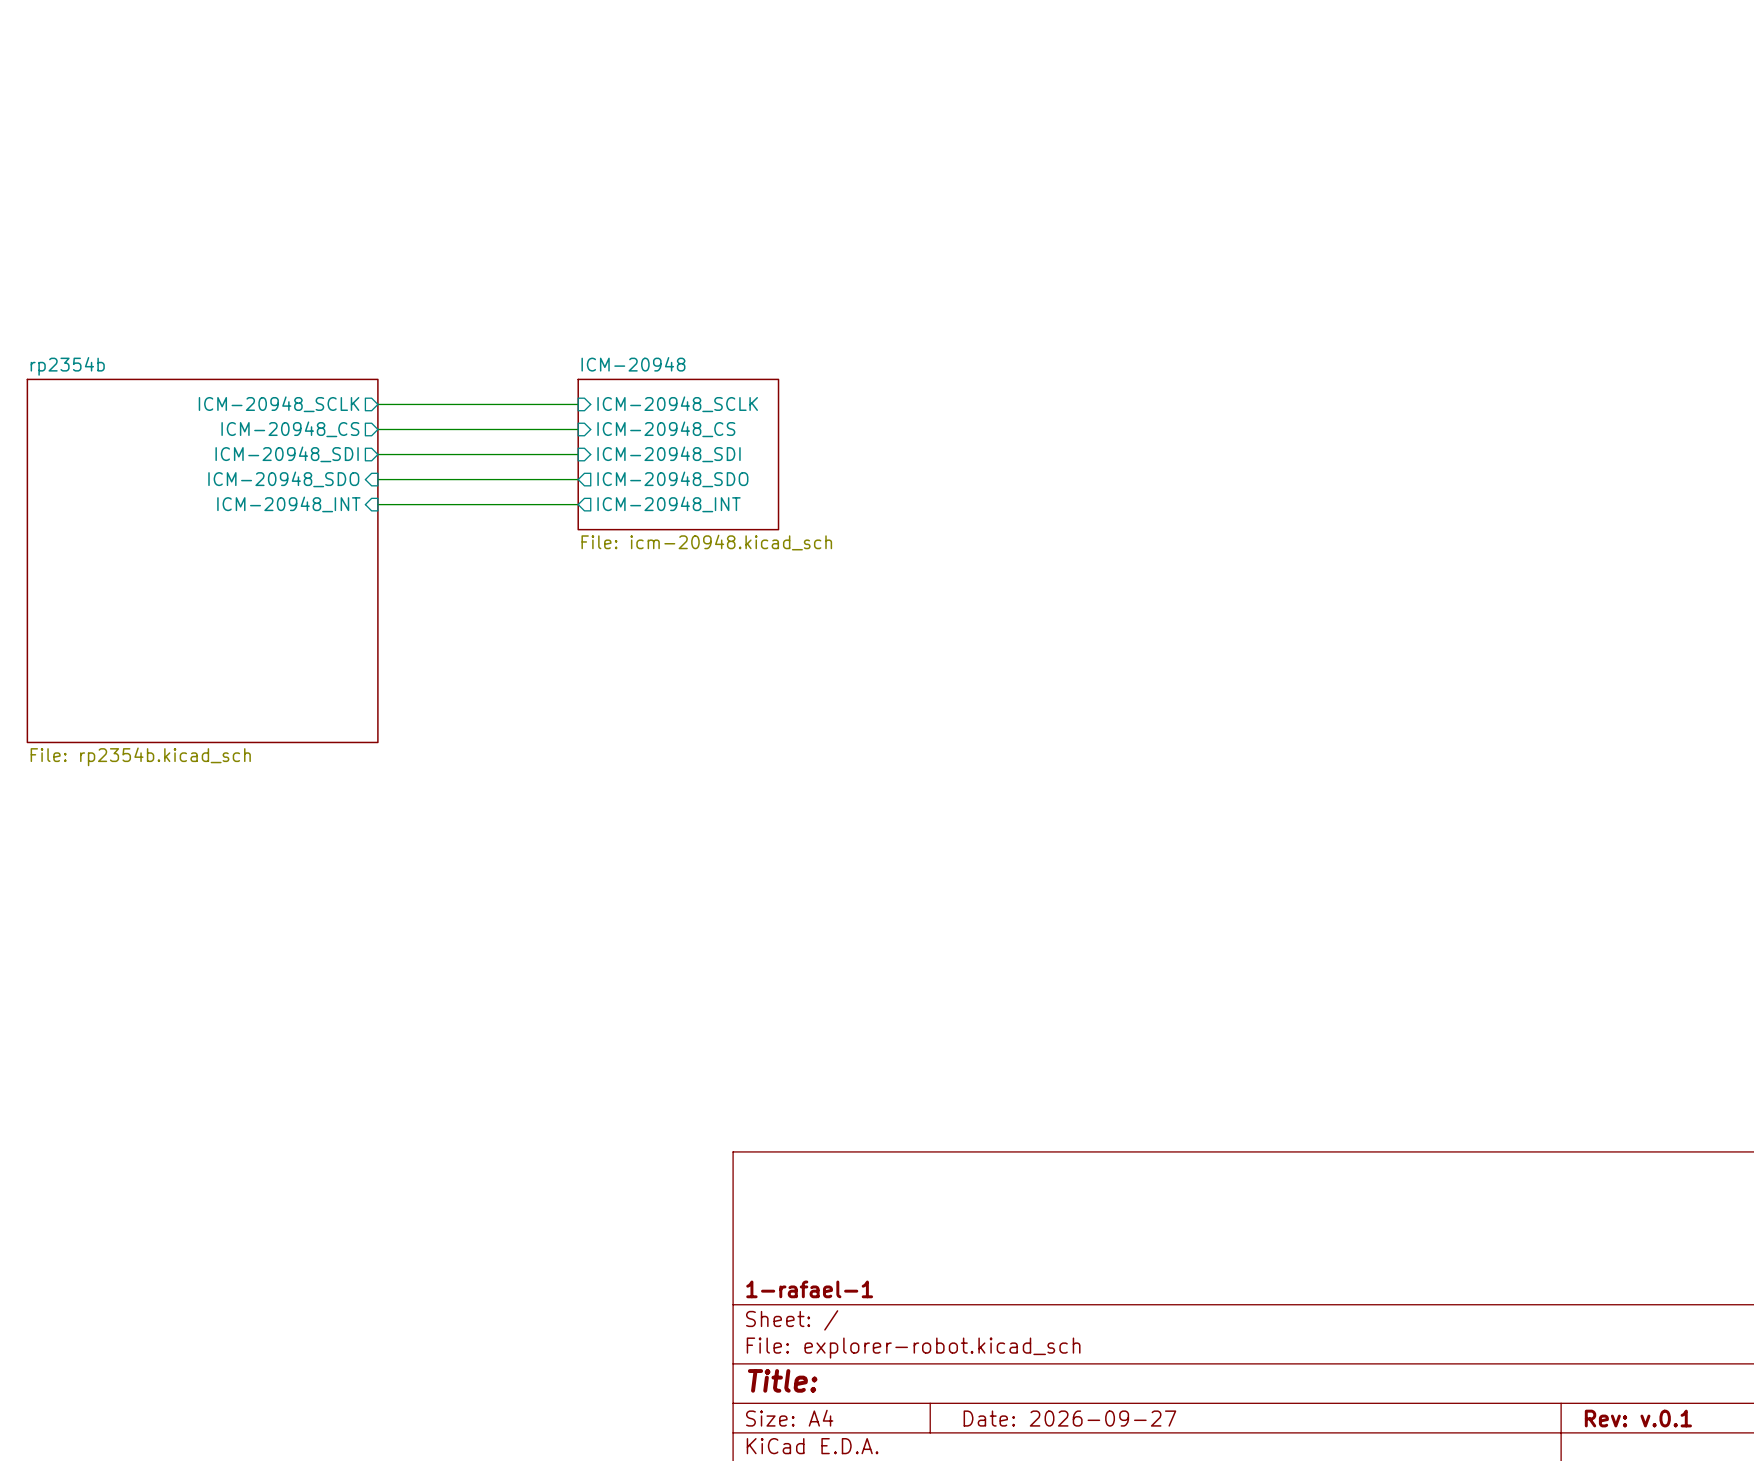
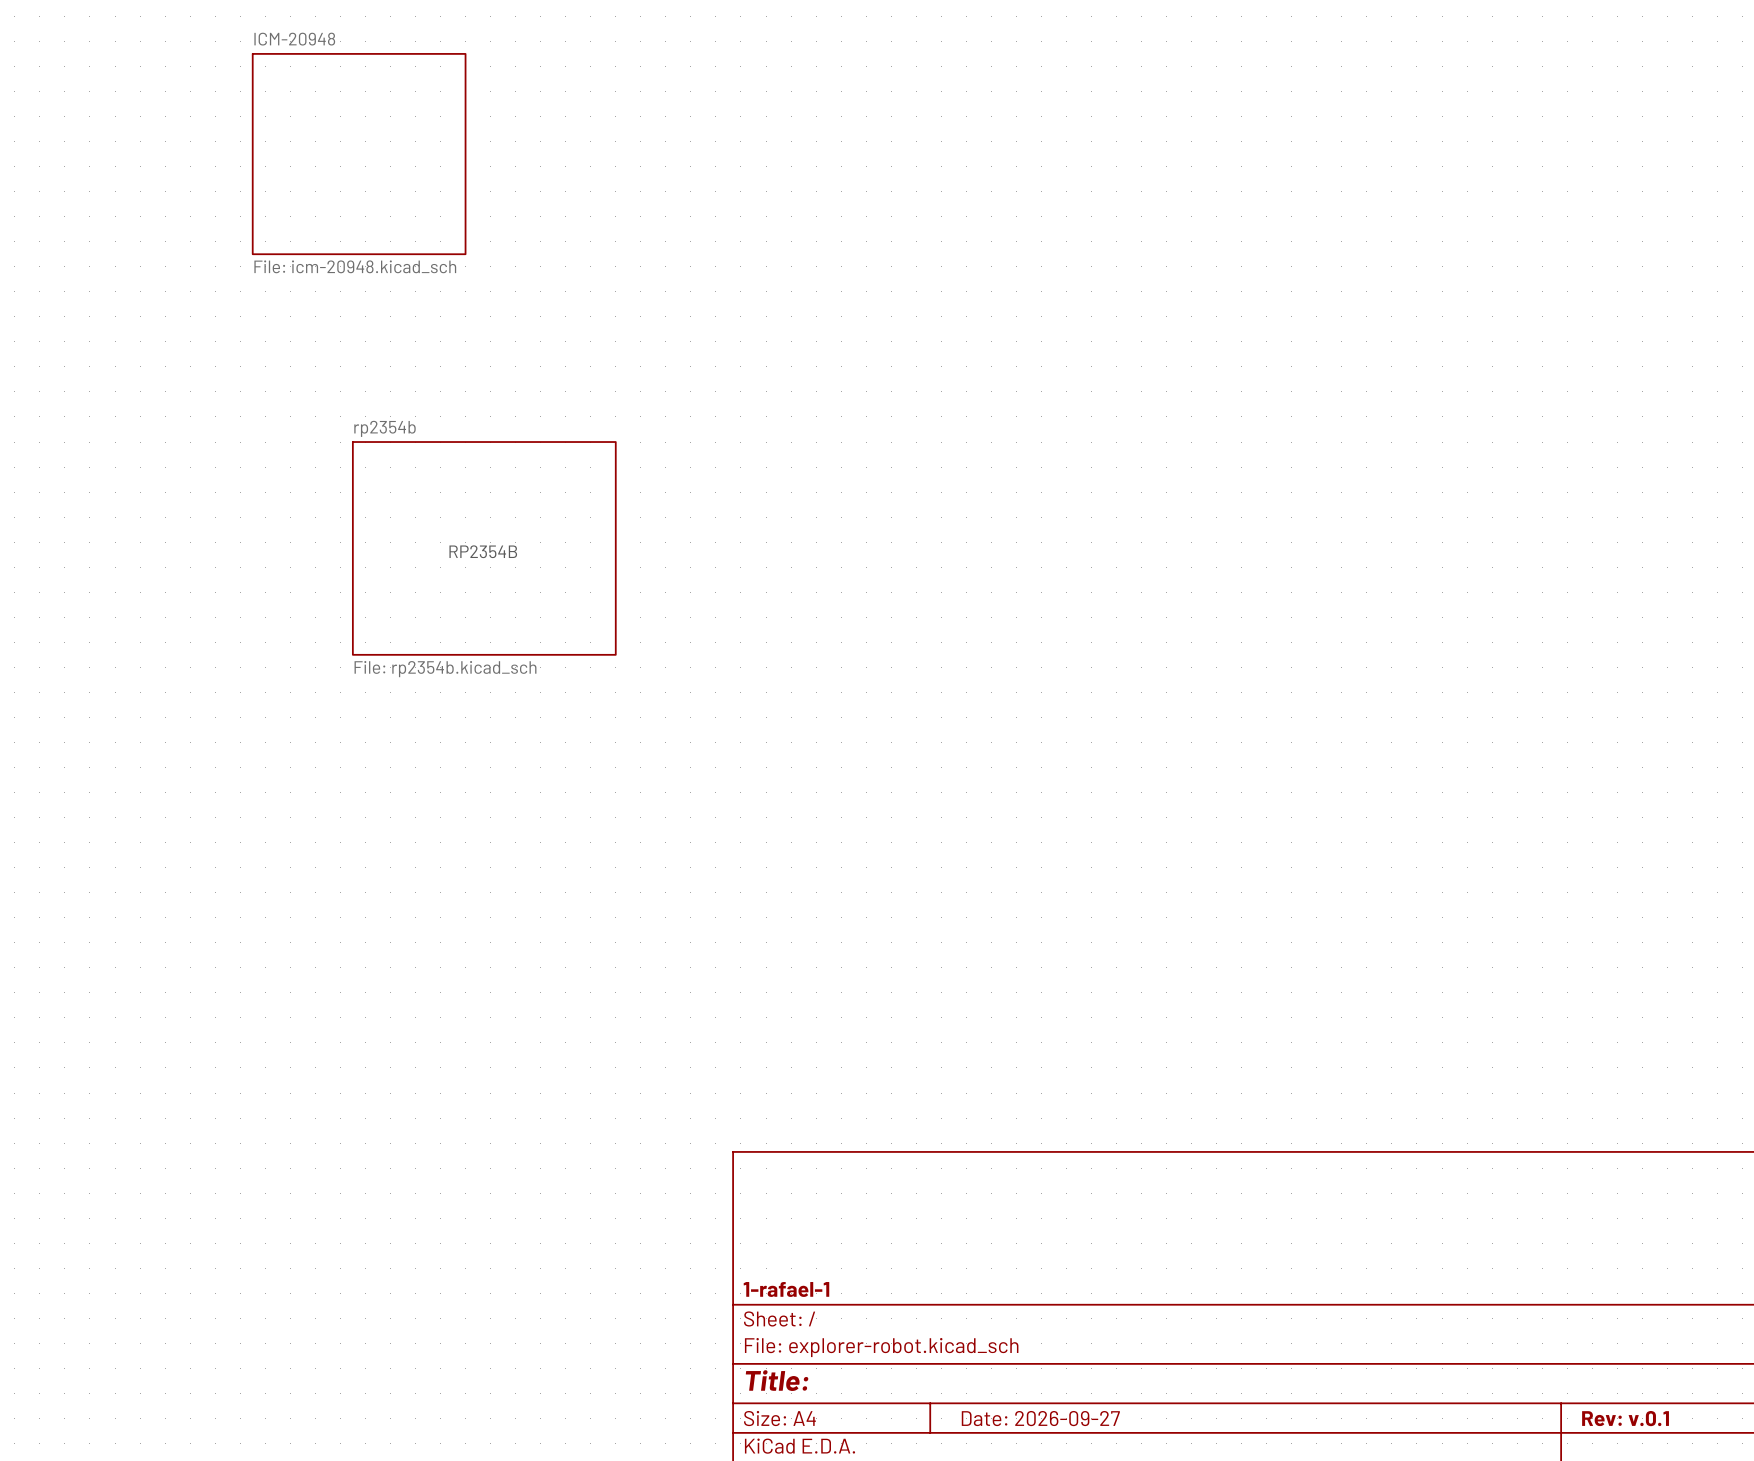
sheet ICM-20948 name position: ICM-20948 (633, 364) -> ICM-20948 (294, 39)
sheet rp2354b name position: rp2354b (67, 366) -> rp2354b (385, 428)
sheet rp2354b shape: [26, 378, 379, 744] -> [352, 441, 617, 656]
sheet ICM-20948 shape: [577, 378, 780, 531] -> [251, 53, 467, 255]
sheet pin: ICM-20948_SCLK (279, 404) -> none
wire: (377, 404) (578, 404) -> none
sheet pin: ICM-20948_SCLK (677, 404) -> none
sheet pin: ICM-20948_CS (290, 429) -> none
wire: (377, 429) (578, 429) -> none
sheet pin: ICM-20948_CS (666, 429) -> none
sheet pin: ICM-20948_SDI (287, 454) -> none
wire: (377, 454) (578, 454) -> none
sheet pin: ICM-20948_SDI (669, 454) -> none
sheet pin: ICM-20948_SDO (283, 479) -> none
wire: (377, 479) (578, 479) -> none
sheet pin: ICM-20948_SDO (672, 479) -> none
sheet pin: ICM-20948_INT (288, 504) -> none
wire: (377, 504) (578, 504) -> none
sheet pin: ICM-20948_INT (669, 504) -> none
sheet ICM-20948 value position: File: icm-20948.kicad_sch (706, 542) -> File: icm-20948.kicad_sch (355, 266)
text: none -> RP2354B (483, 551)
sheet rp2354b value position: File: rp2354b.kicad_sch (140, 756) -> File: rp2354b.kicad_sch (445, 669)

